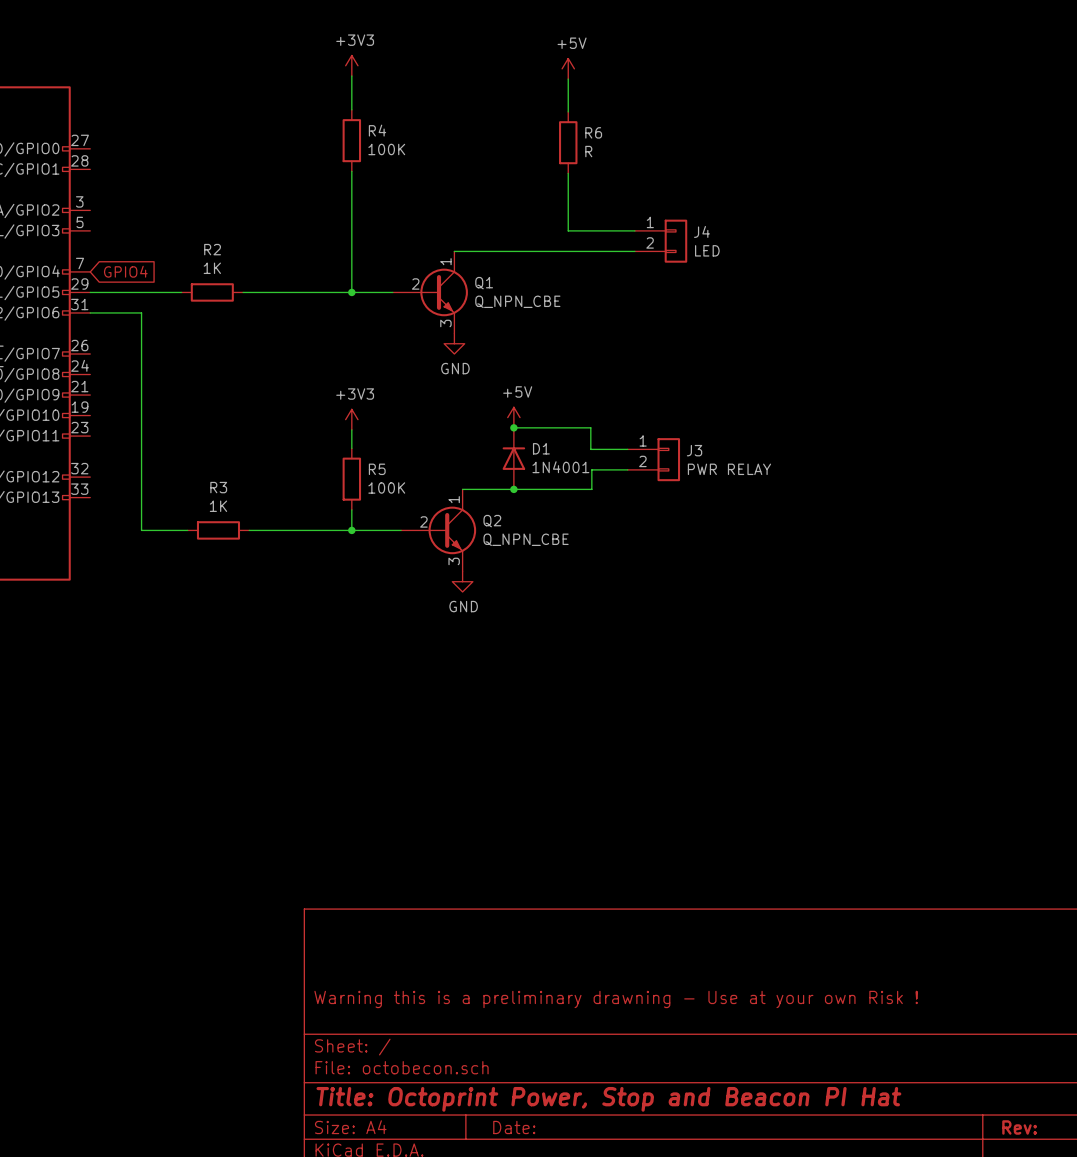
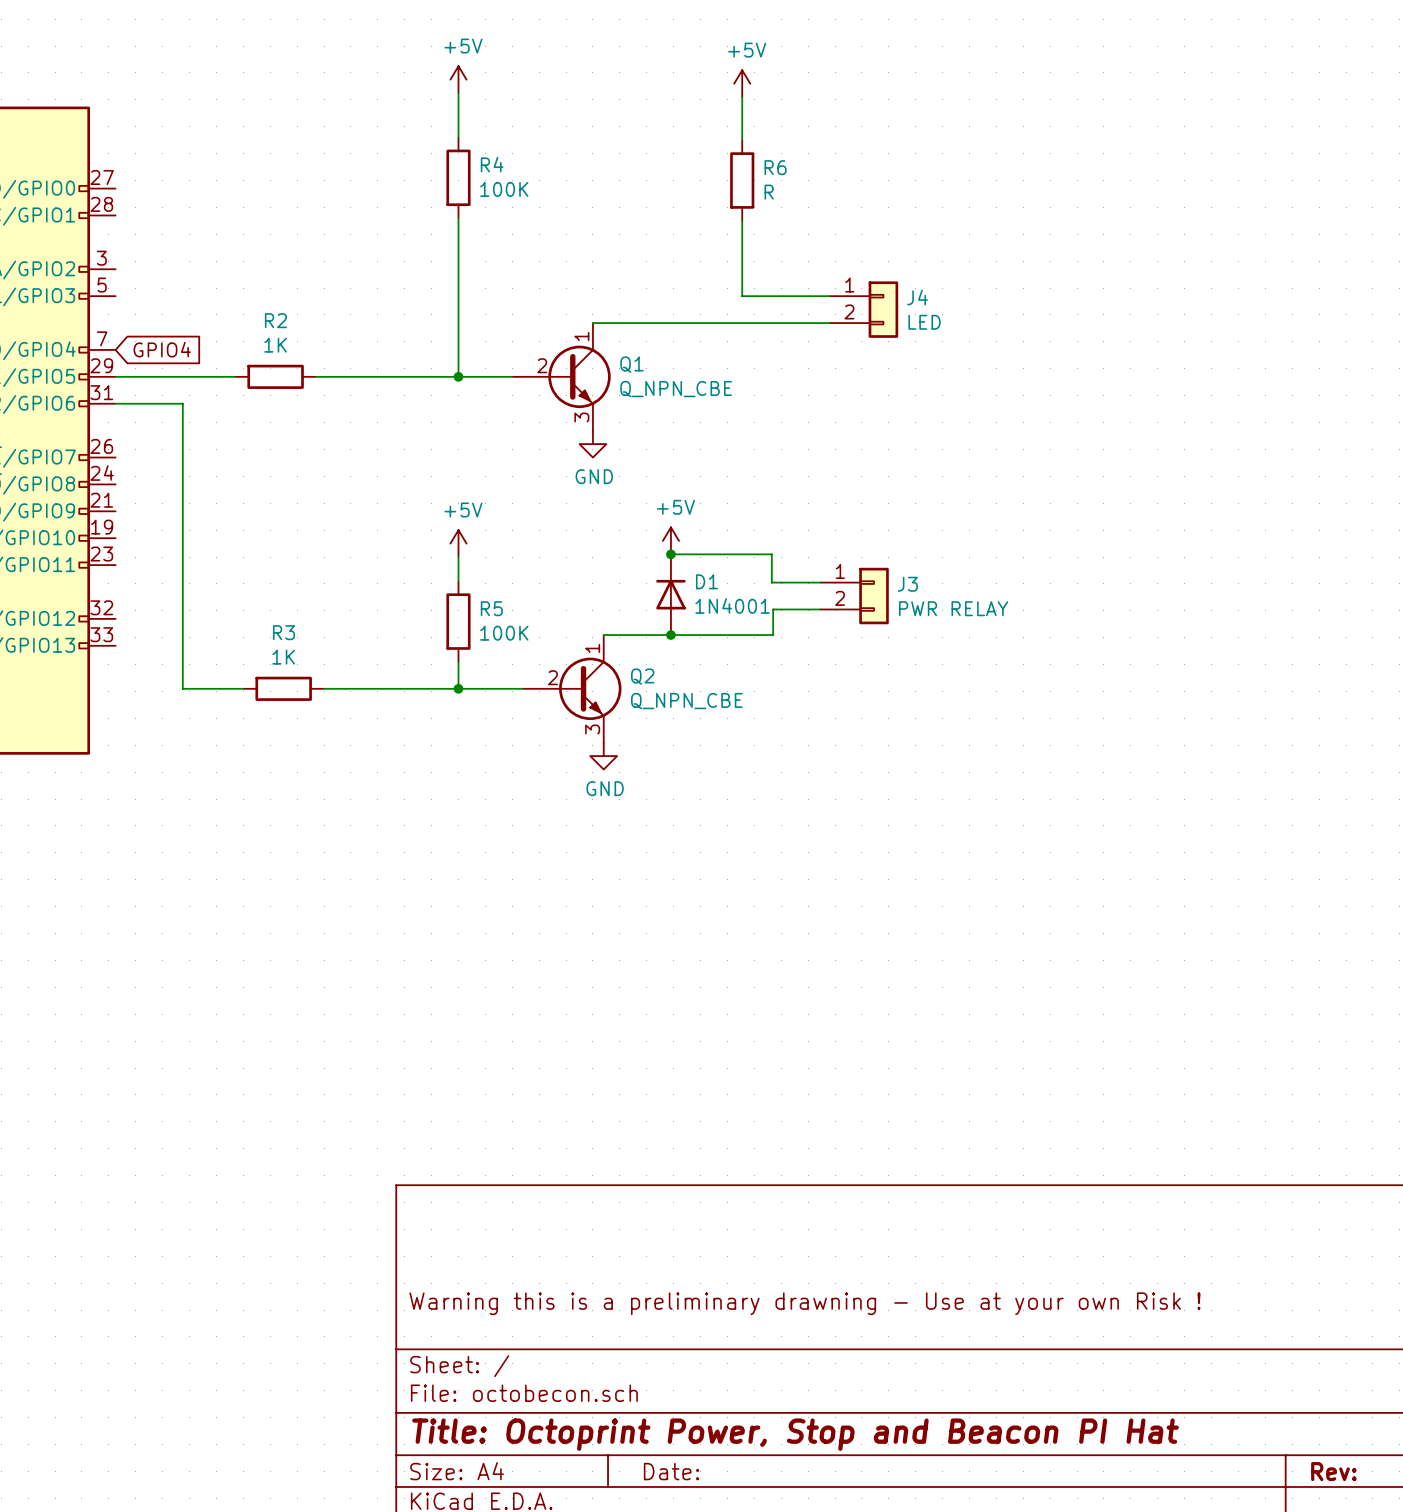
power symbol: +3V3 (351, 65) -> +5V (458, 79)
power symbol: +3V3 (351, 419) -> +5V (458, 543)

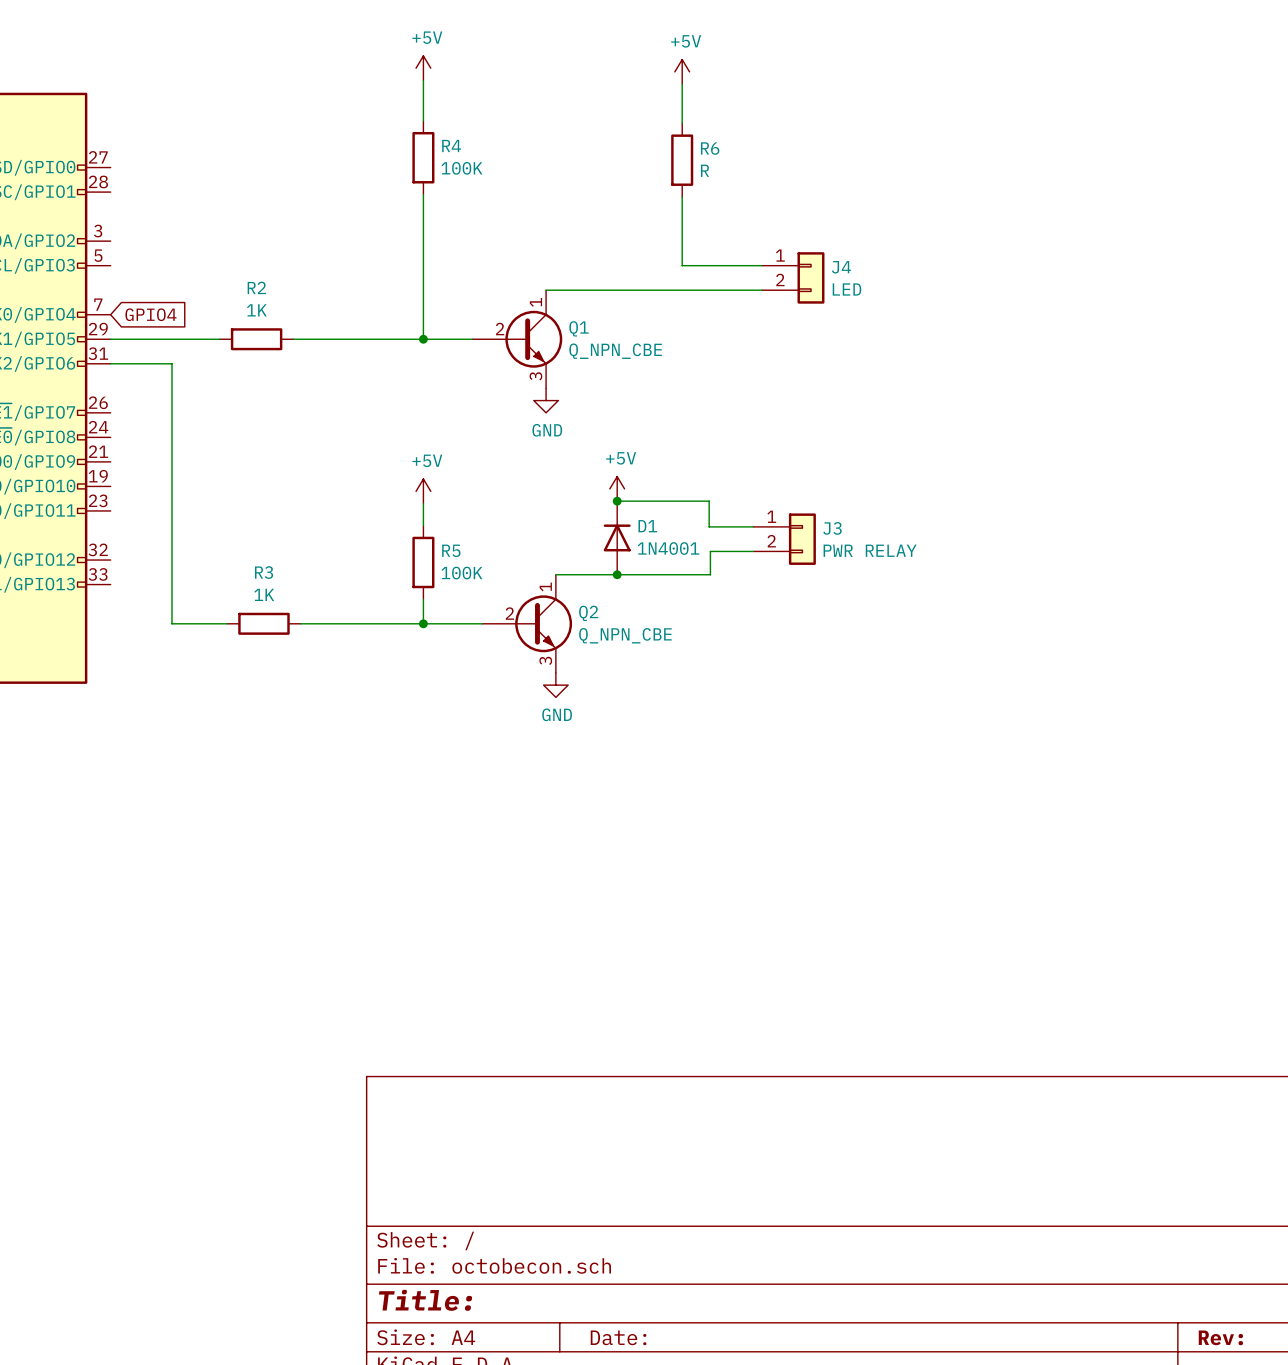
title block: Warning this is a preliminary drawning - Use at your own Risk ! (804, 1303) -> none
title block: Title: Octoprint Power, Stop and Beacon PI Hat (795, 1434) -> Title: (425, 1300)

